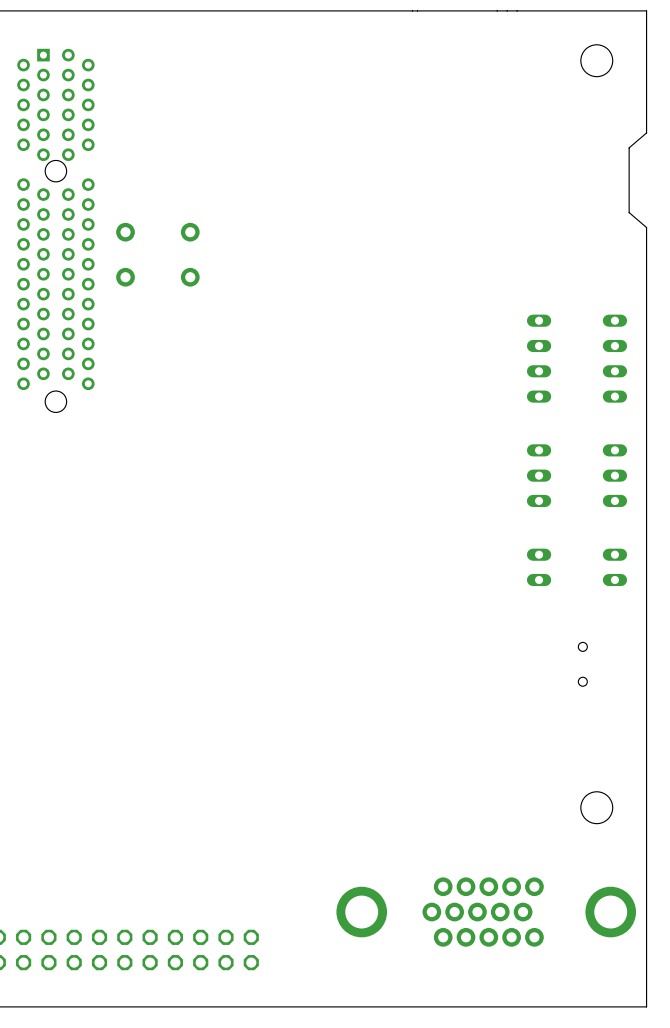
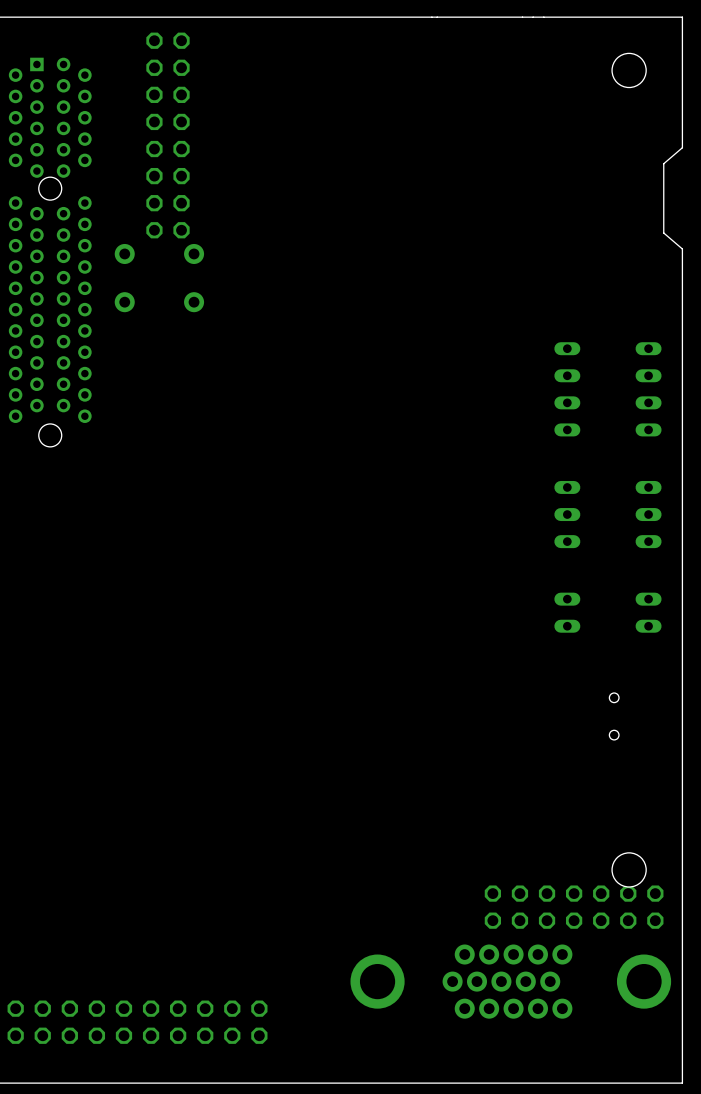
part: none -> (167, 135)
part: none -> (574, 907)

